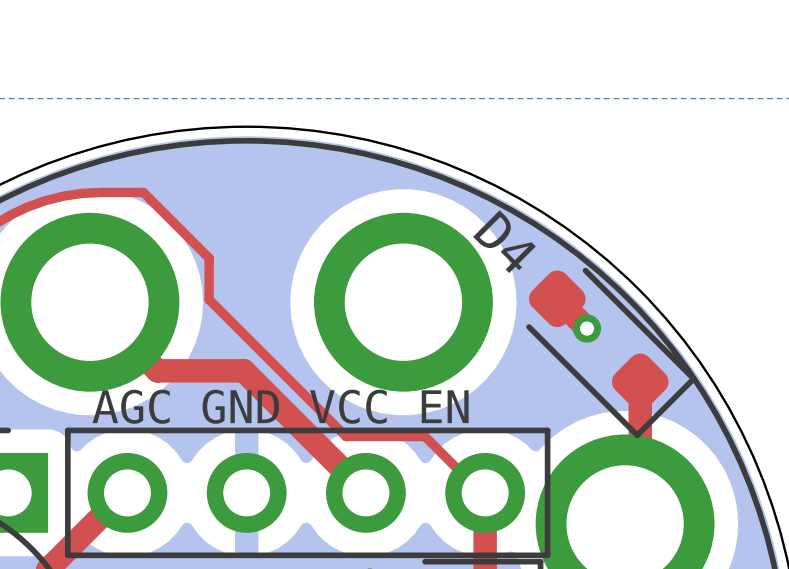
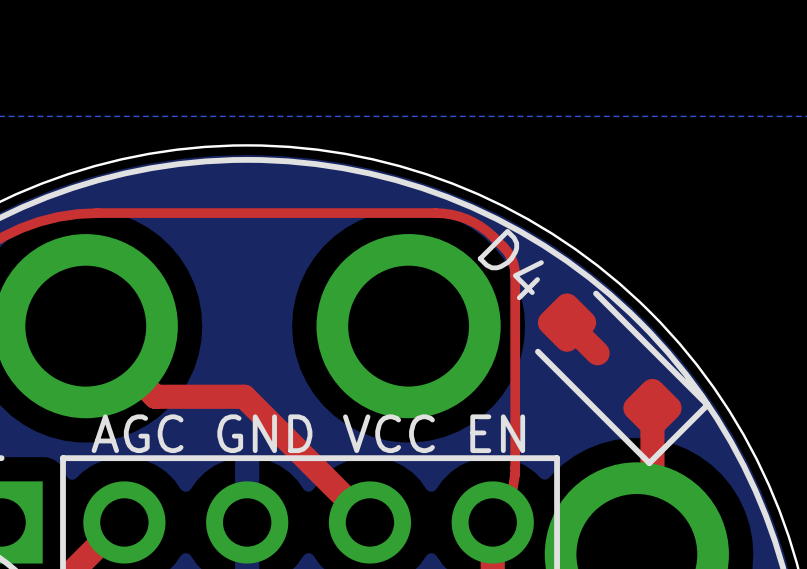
top track: (143, 192) (209, 258) (209, 299) (346, 436) (425, 436) (481, 492) -> (140, 213) (443, 213) (466, 219) (487, 231) (508, 253) (514, 271) (515, 474) (509, 497)
via: (587, 328) -> none

